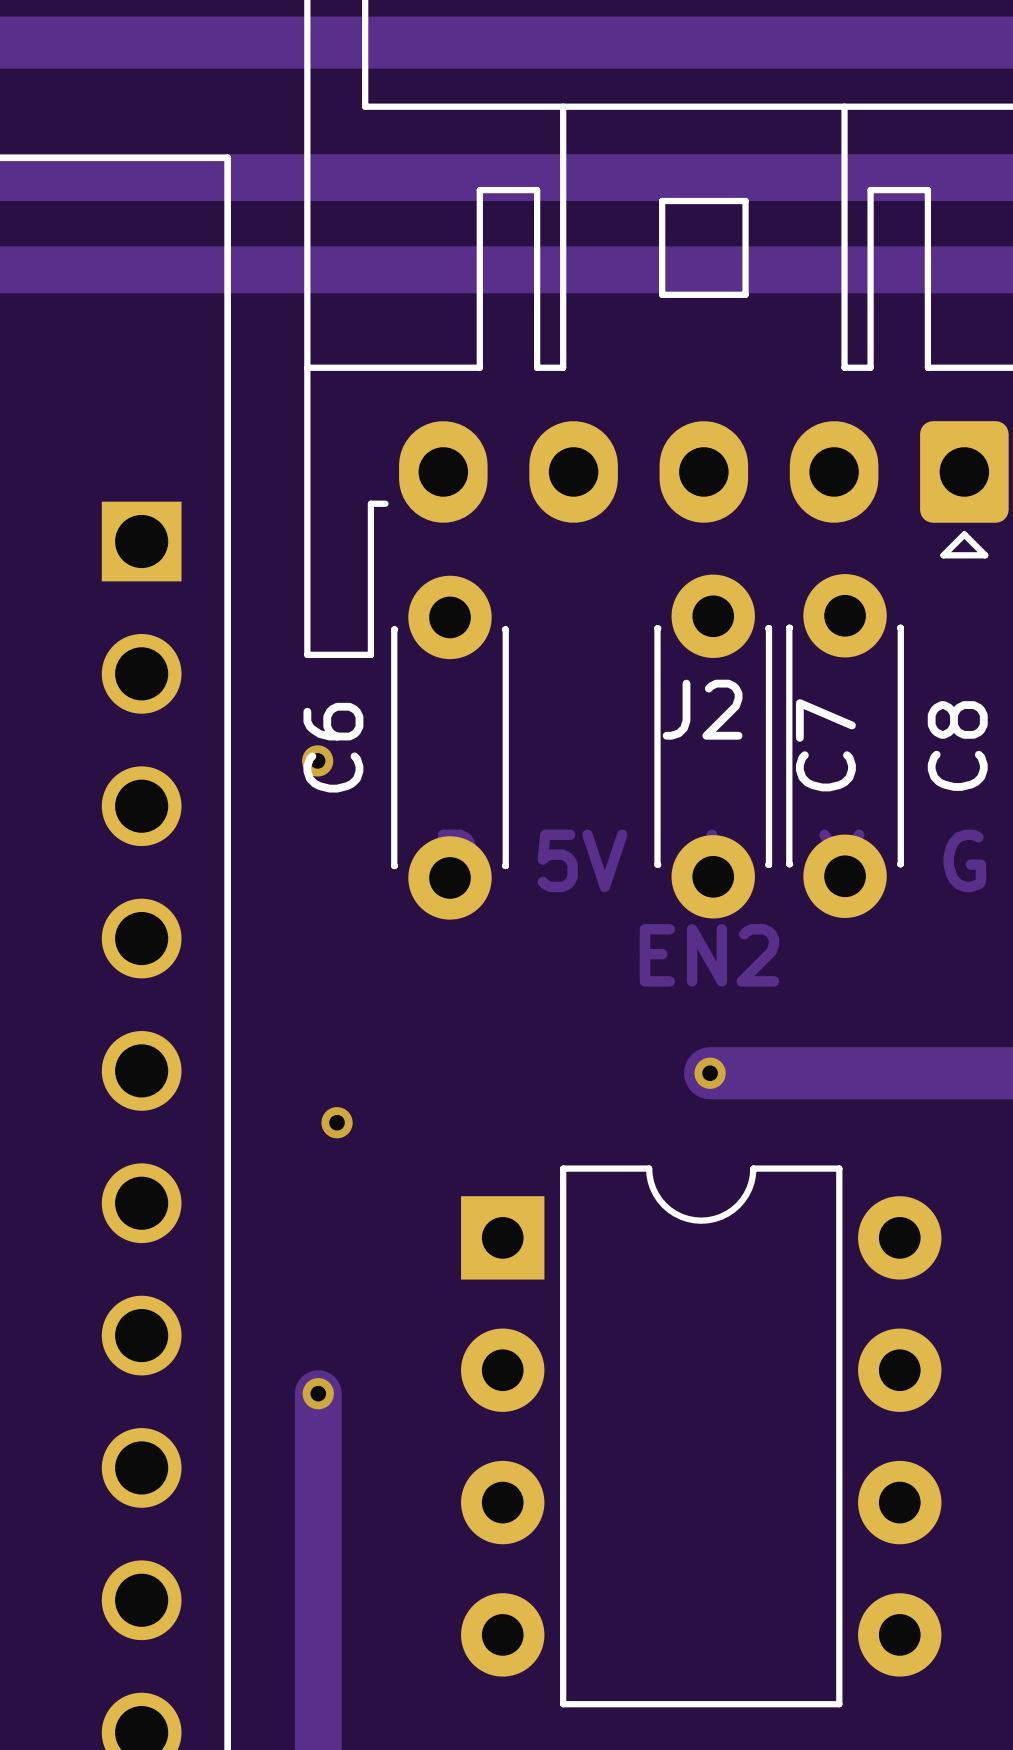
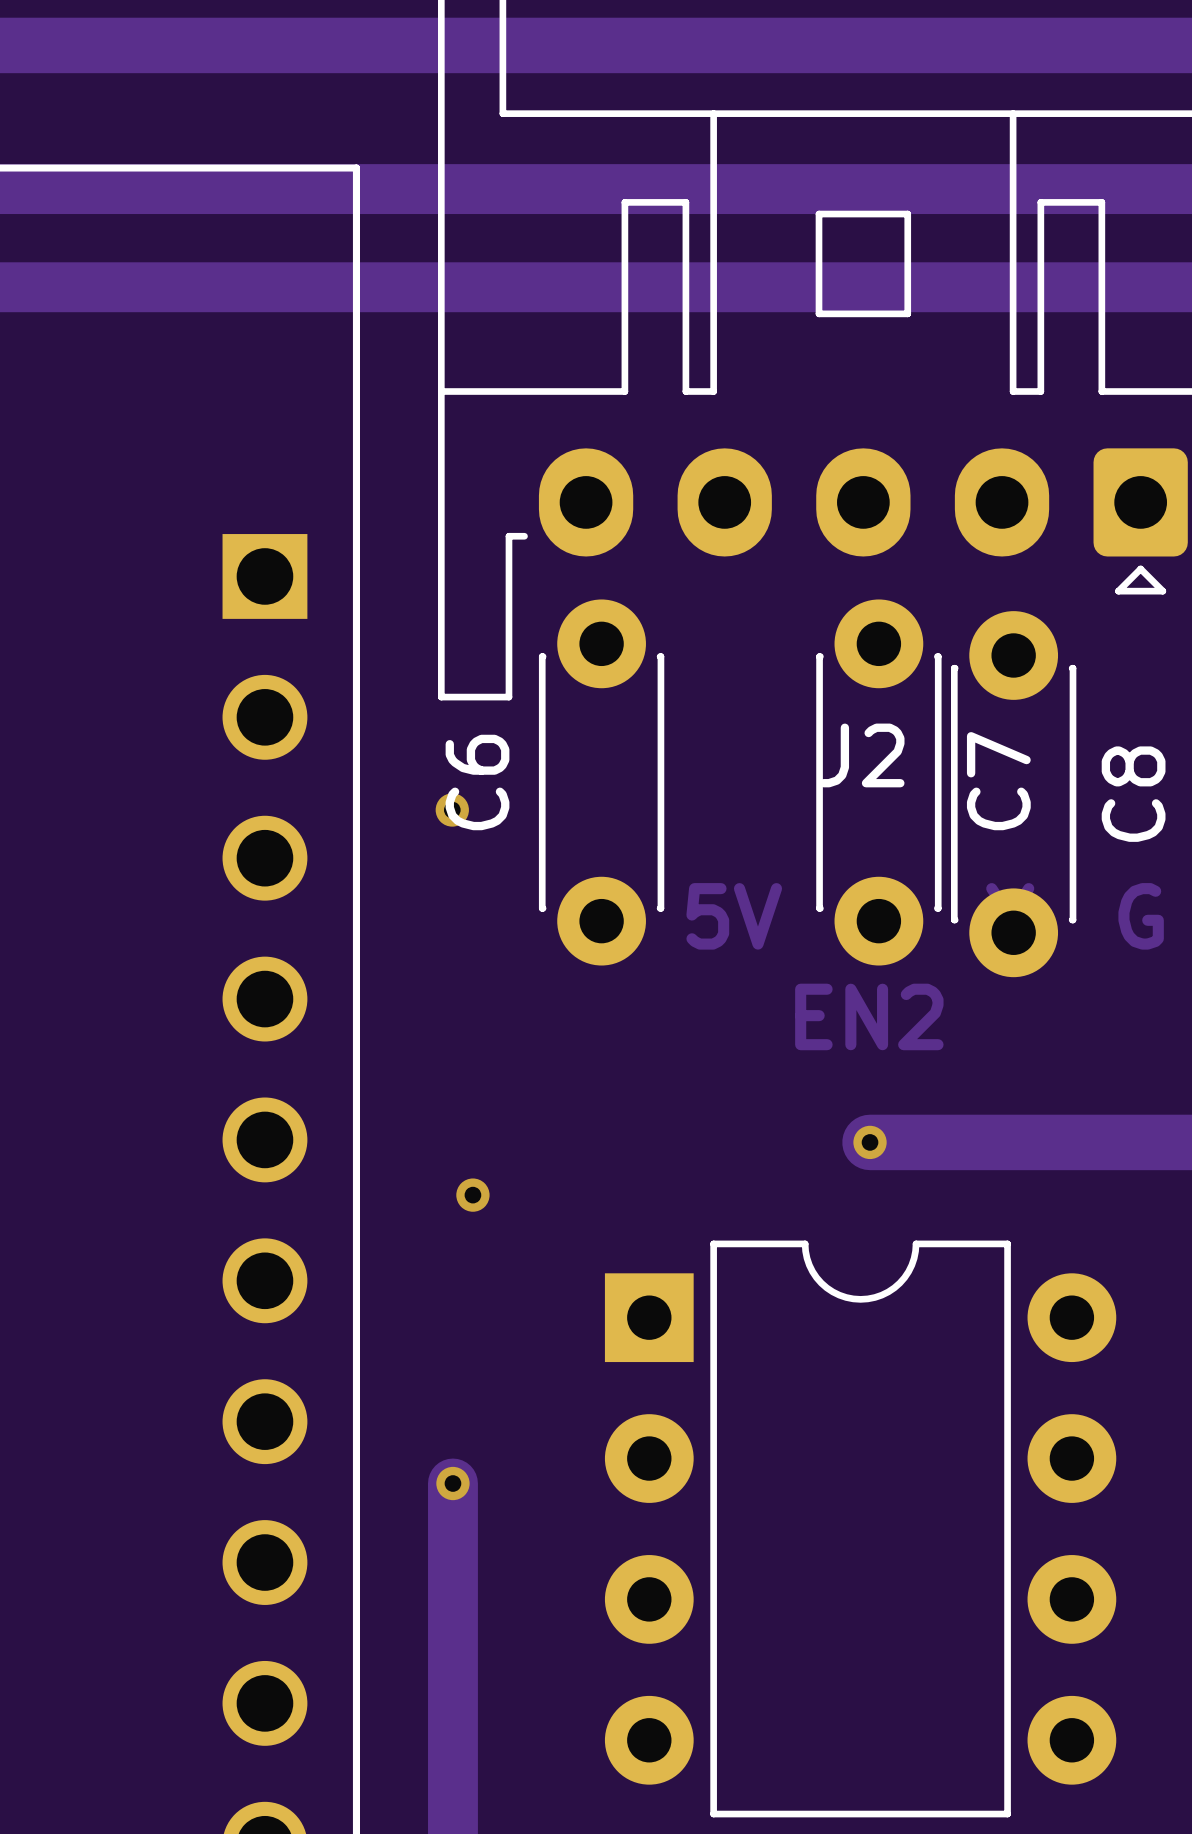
C7 position: (713, 746) -> (878, 782)
C6 position: (450, 747) -> (601, 782)

